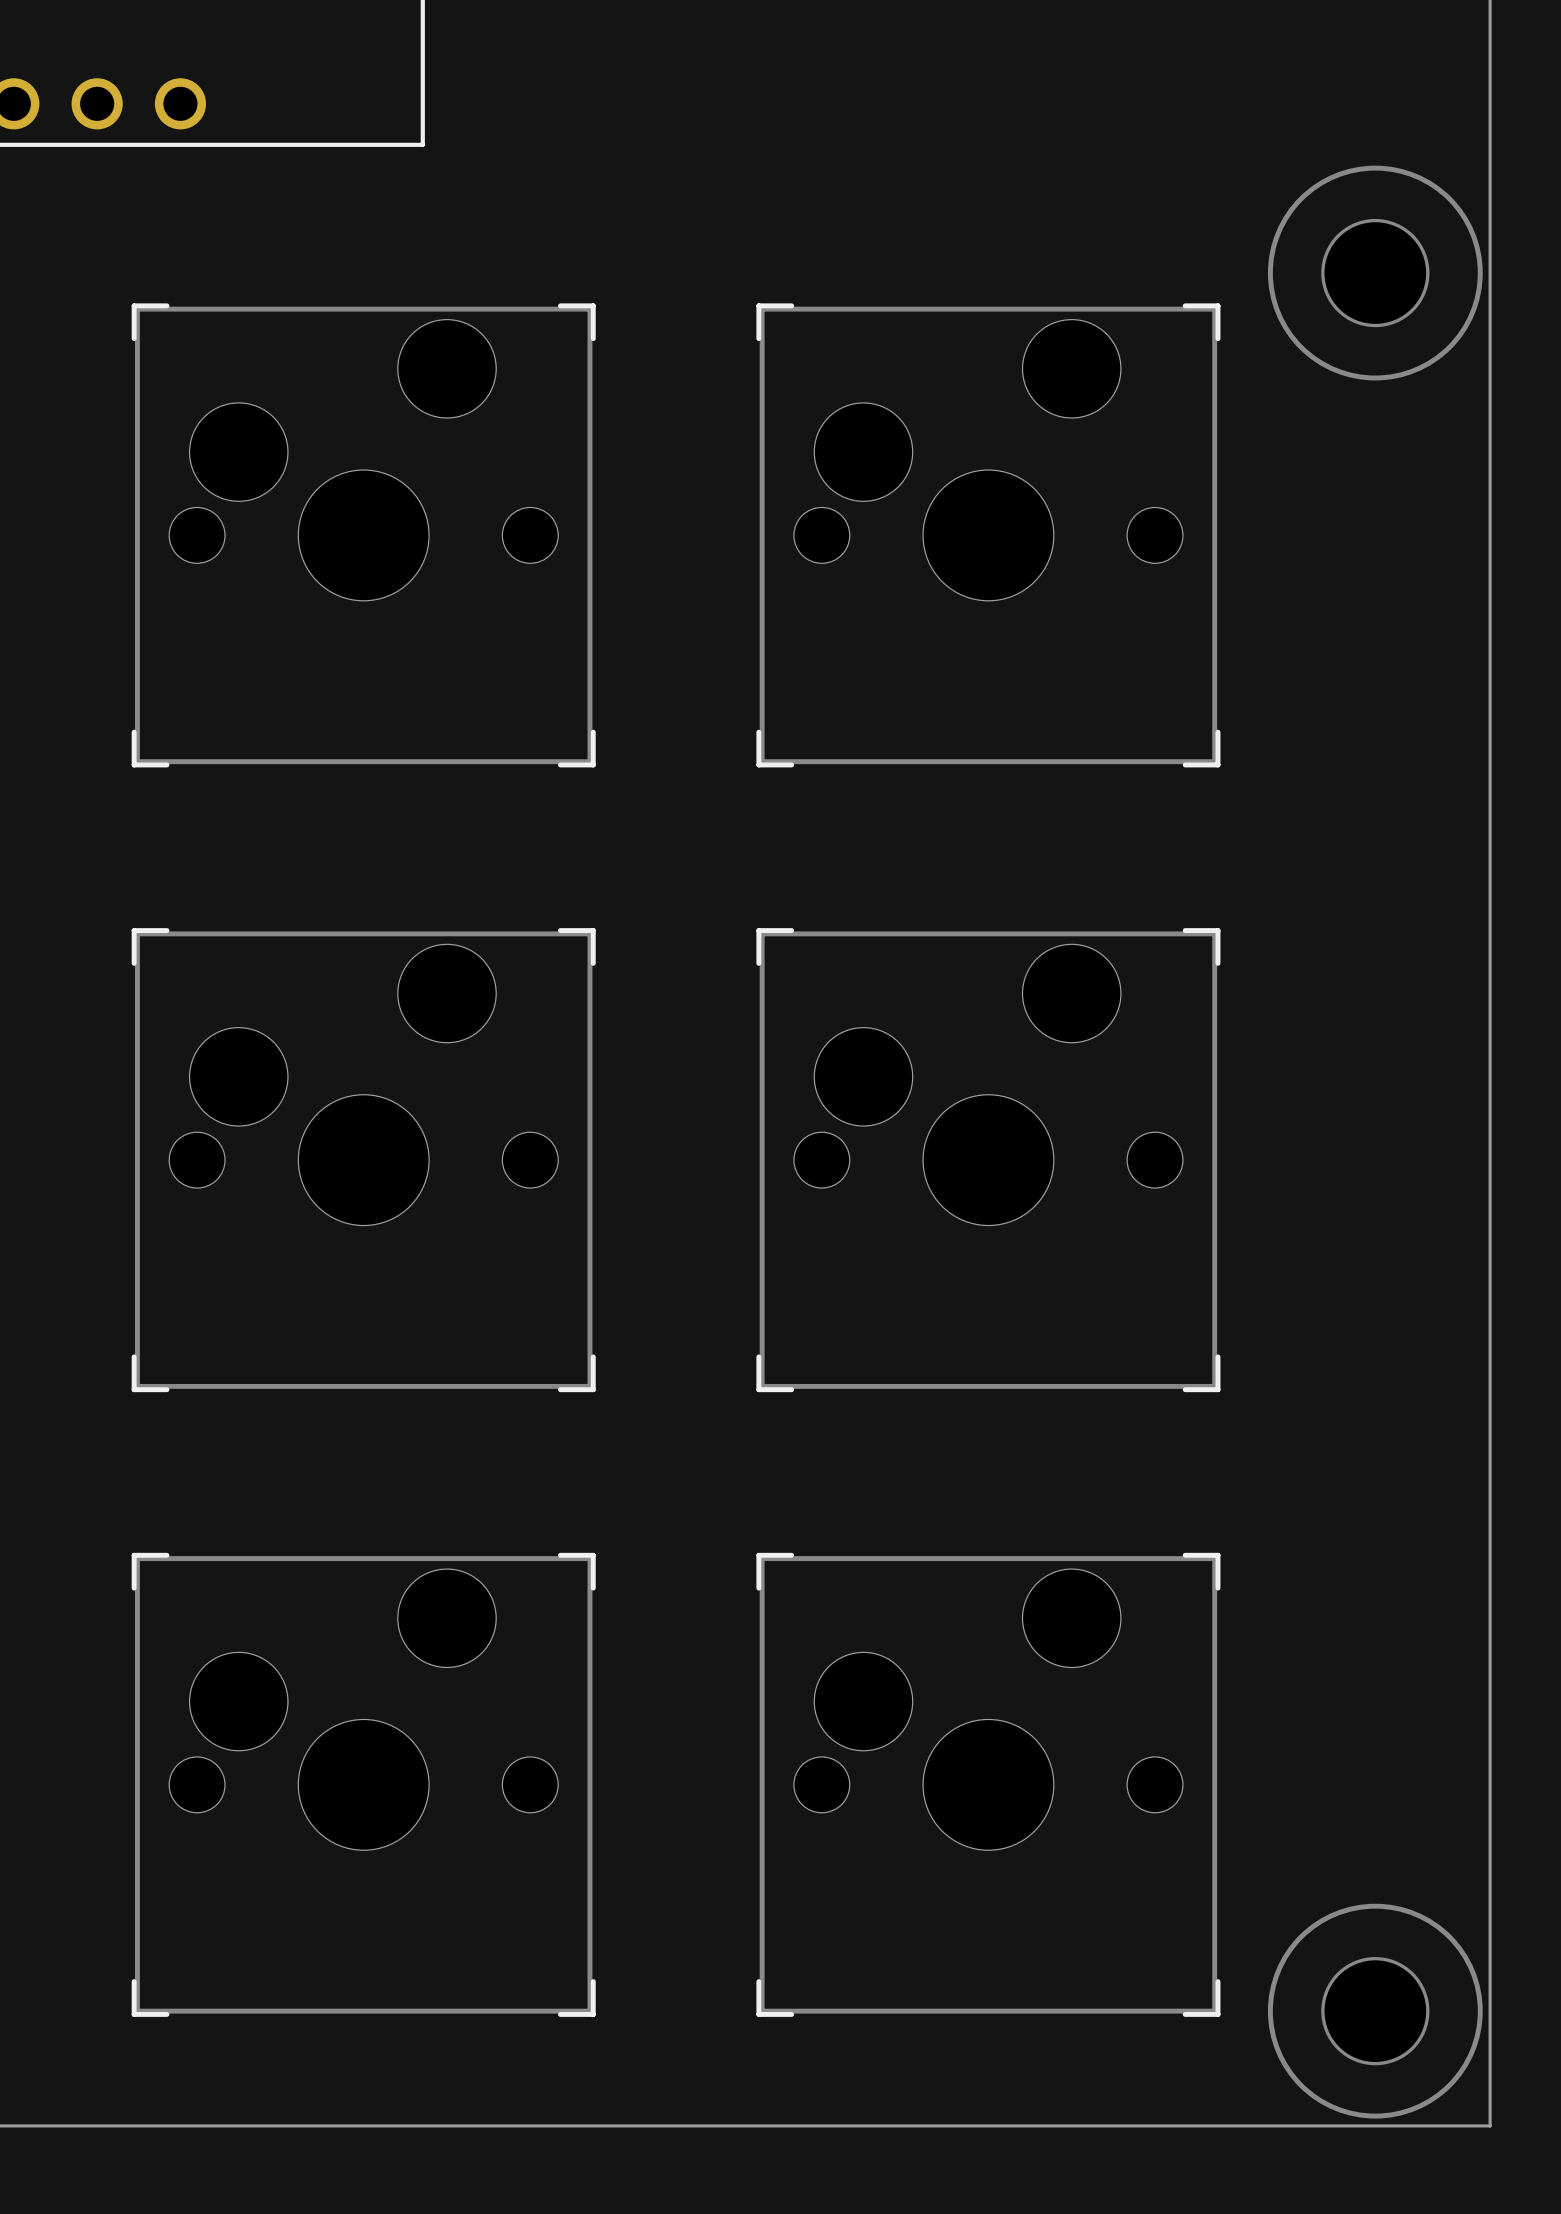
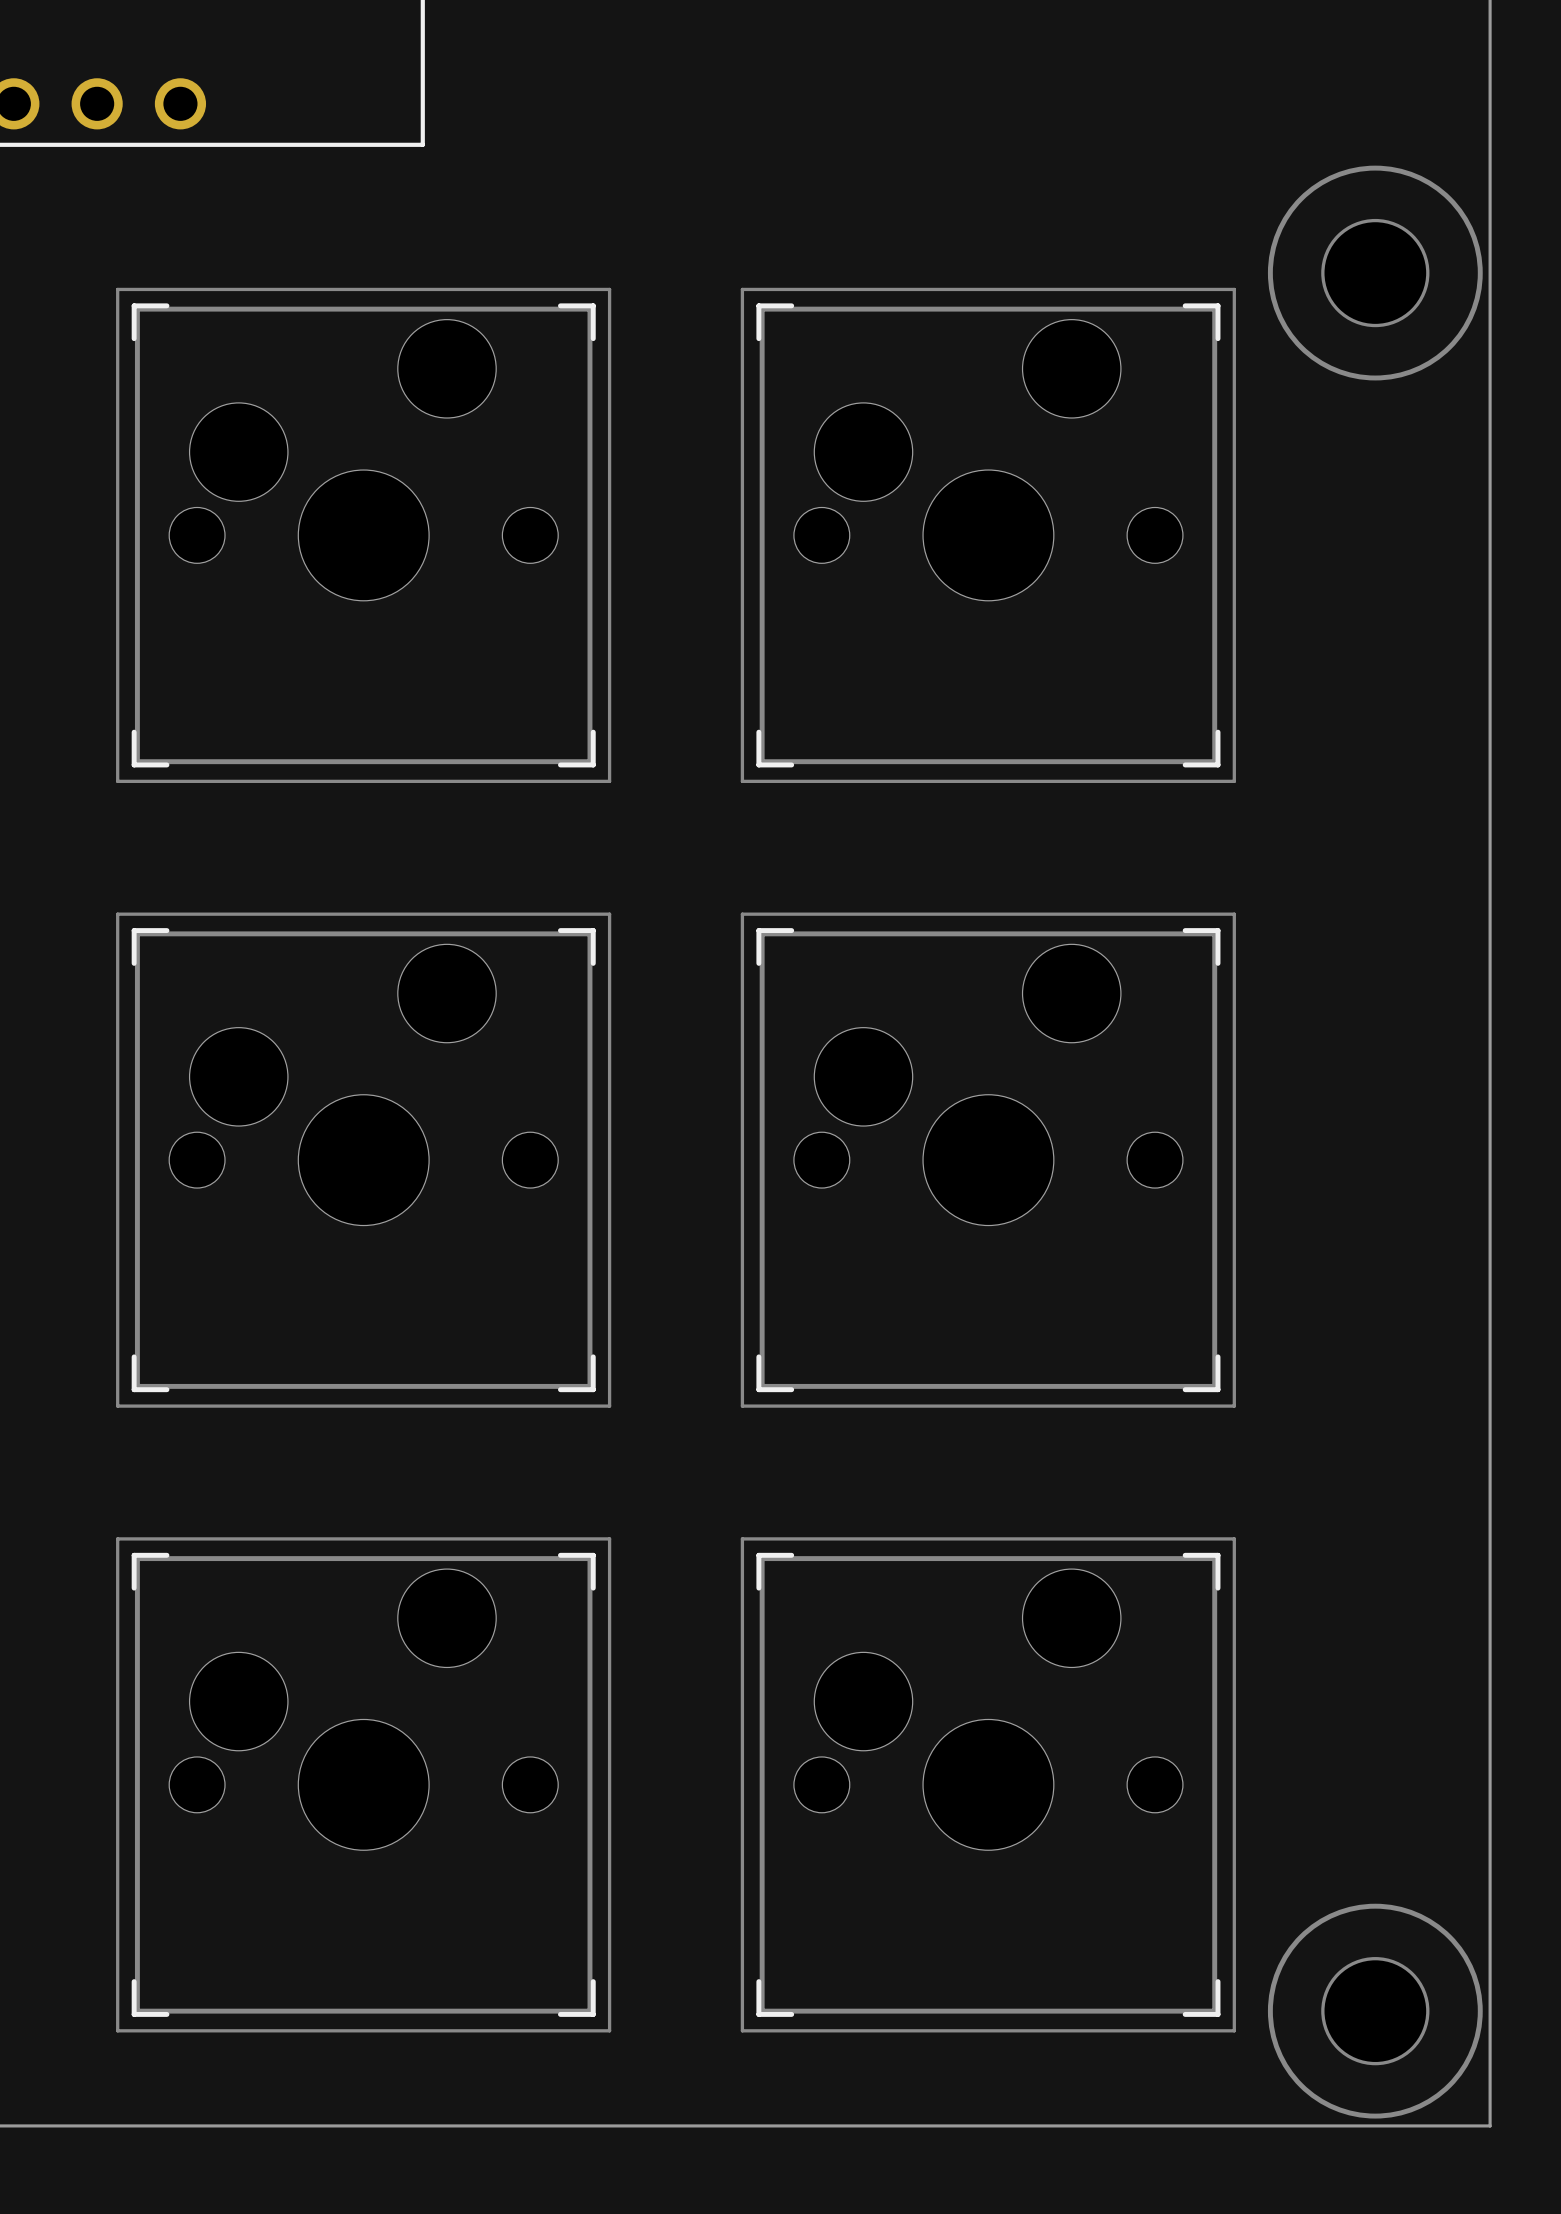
line: none -> (117, 289) (609, 289) (609, 781) (117, 781) (117, 289)
line: none -> (742, 289) (1234, 289) (1234, 781) (742, 781) (742, 289)
line: none -> (117, 914) (609, 914) (609, 1406) (117, 1406) (117, 914)
line: none -> (742, 914) (742, 1406) (1234, 1406) (1234, 914) (742, 914)
line: none -> (117, 1538) (609, 1538) (609, 2030) (117, 2030) (117, 1538)
line: none -> (742, 1538) (742, 2030) (1234, 2030) (1234, 1538) (742, 1538)

